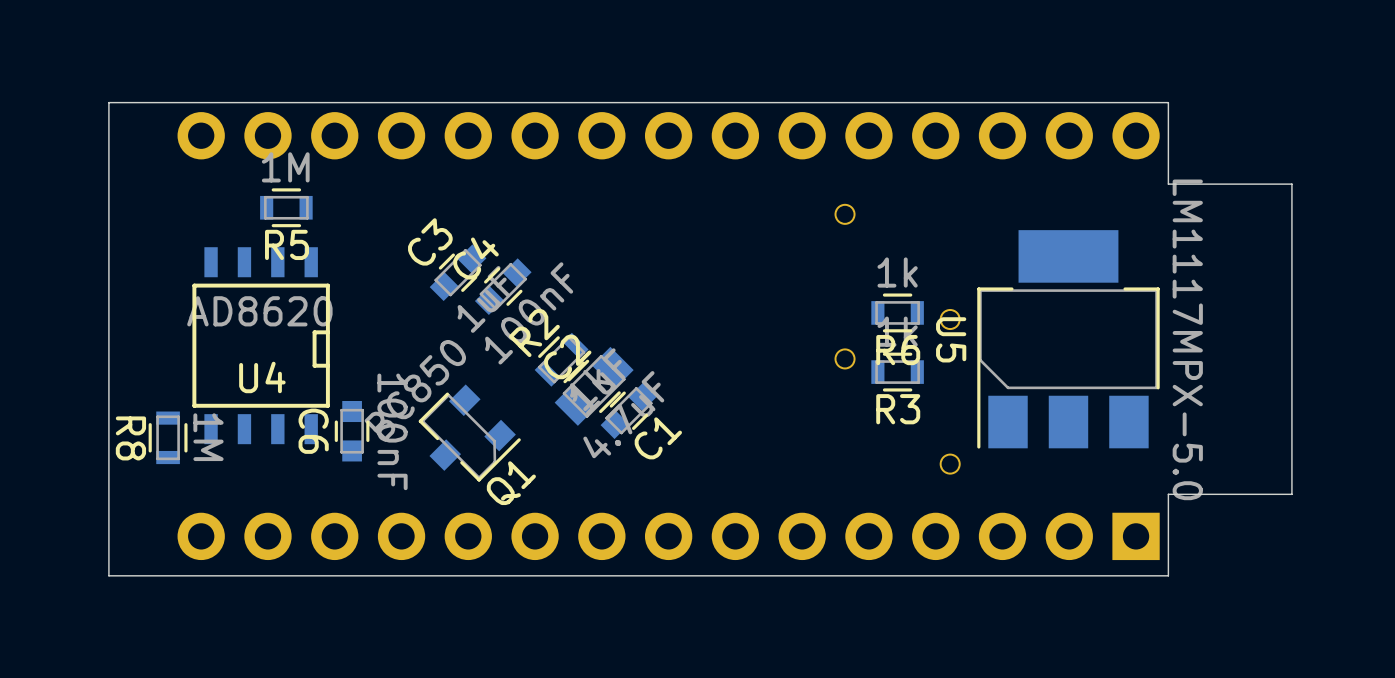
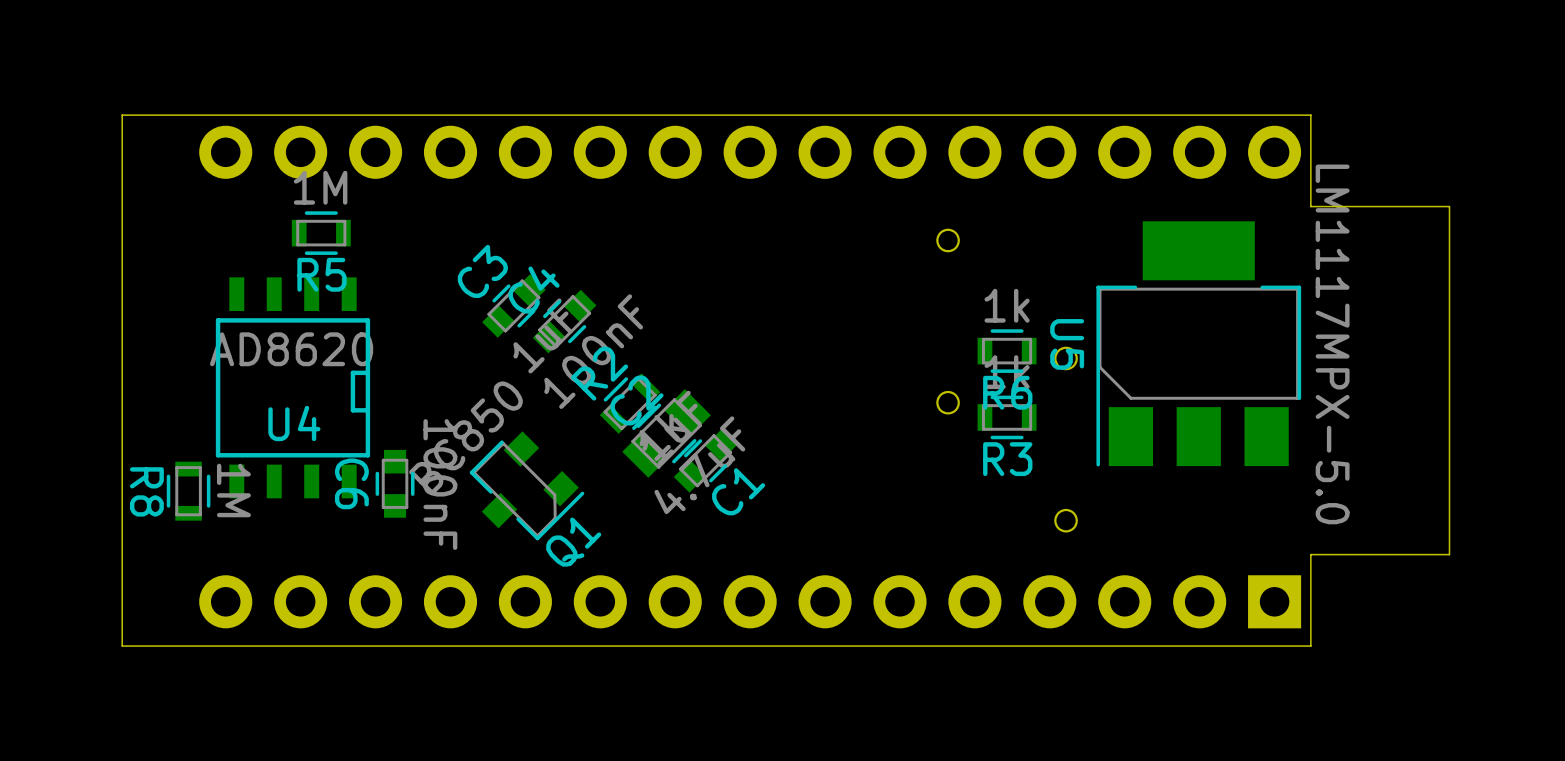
U5 position: (1068, 339) -> (1198, 343)

